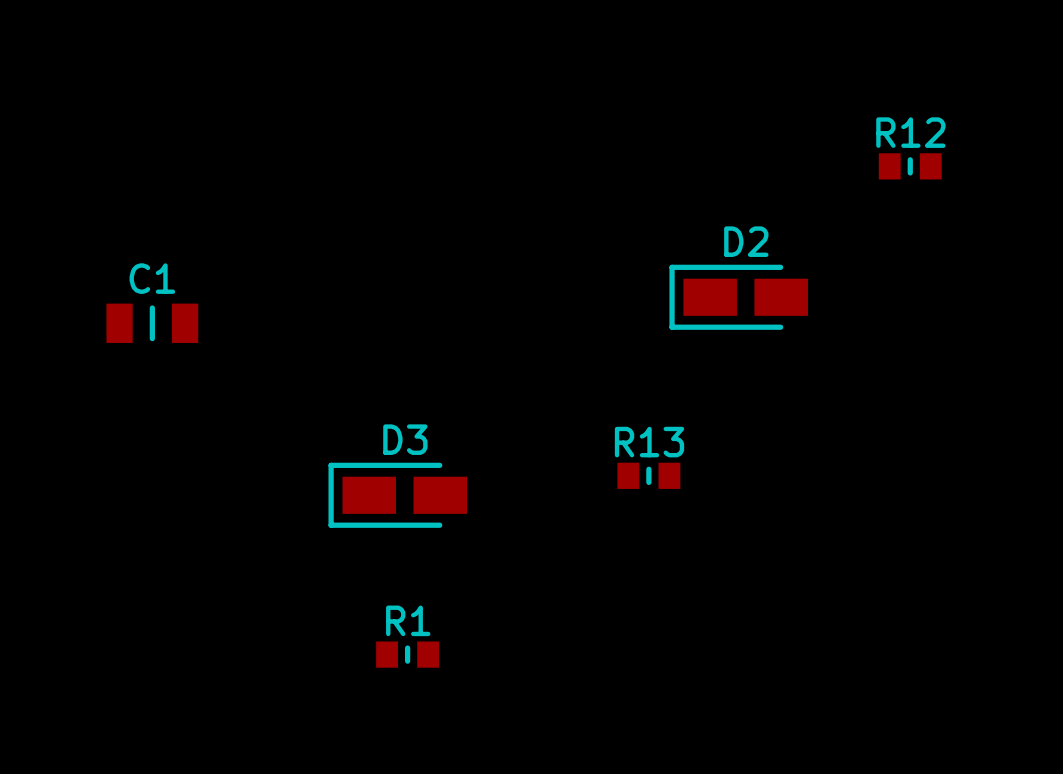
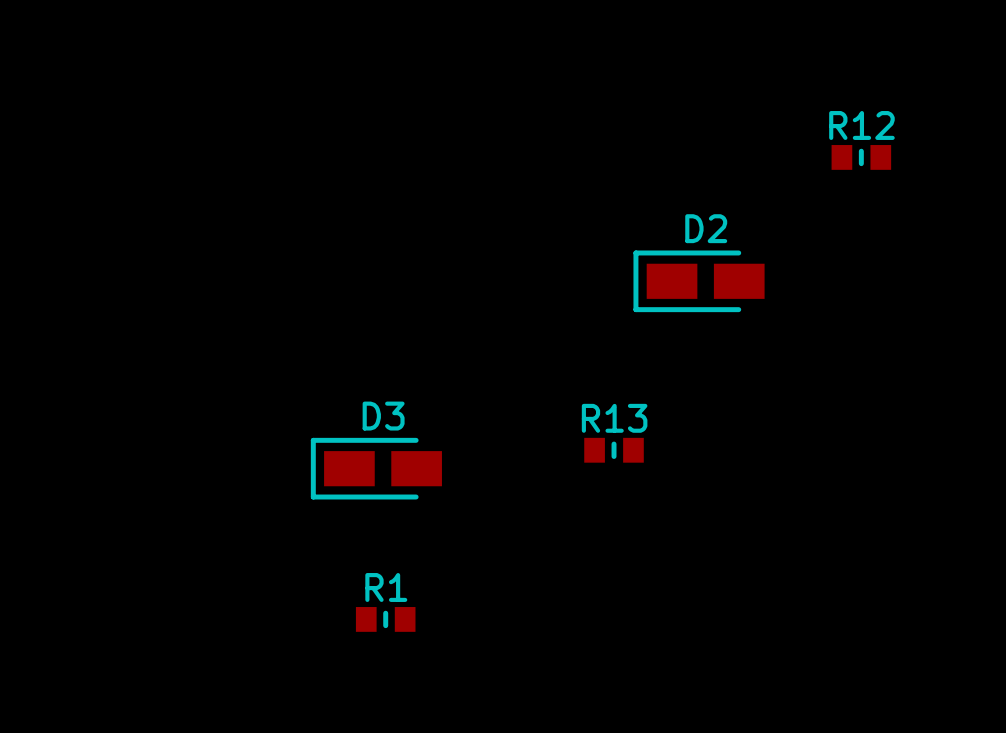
C1: (152, 323) -> none

